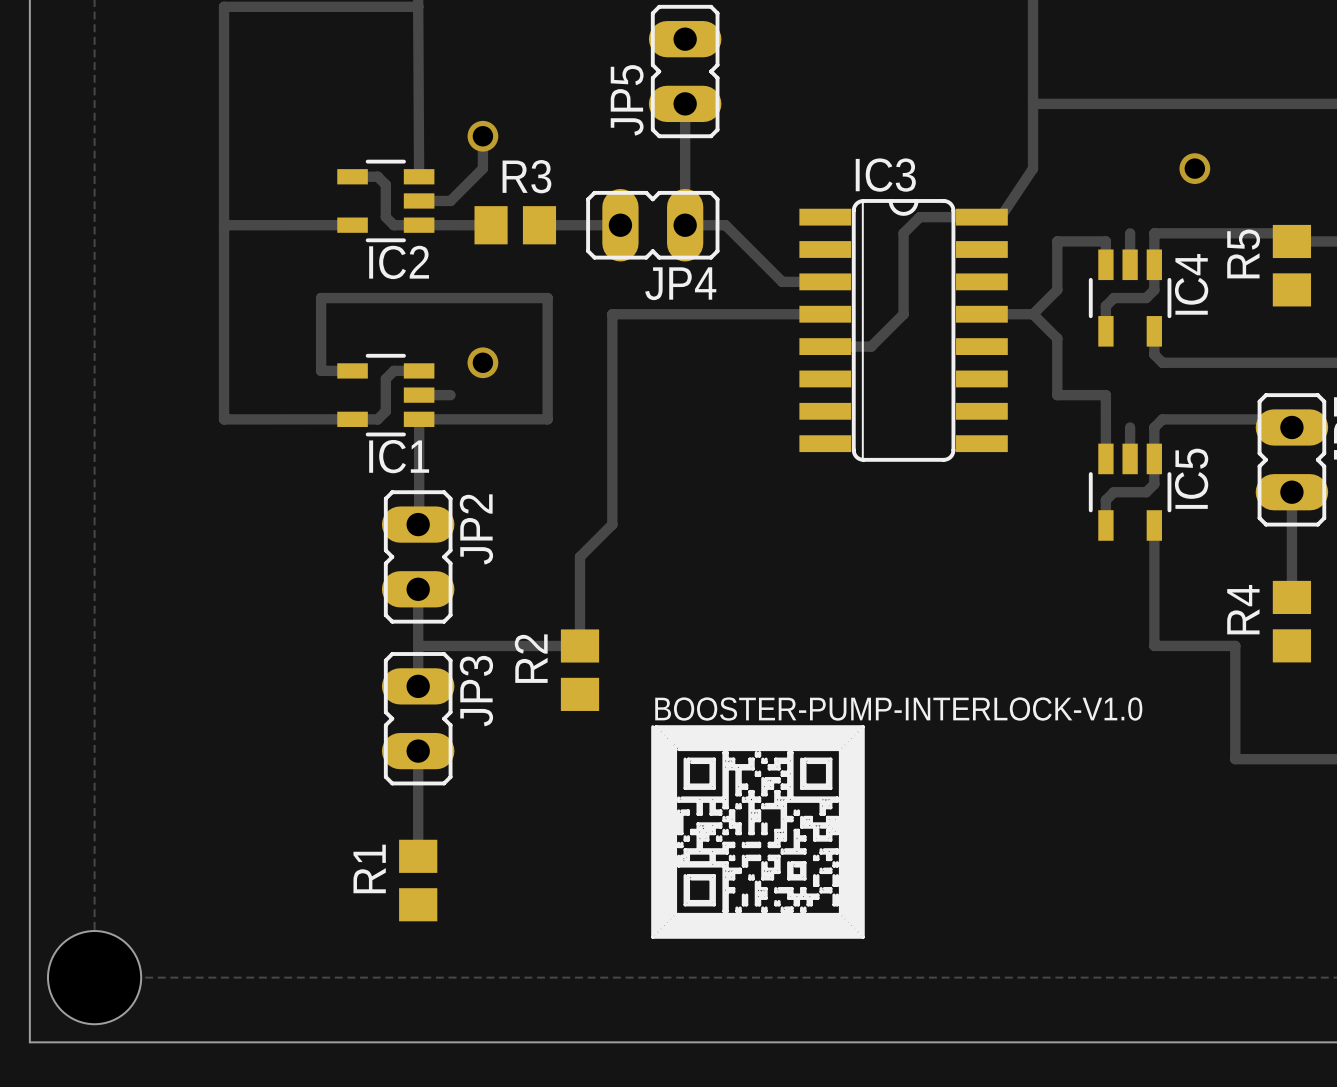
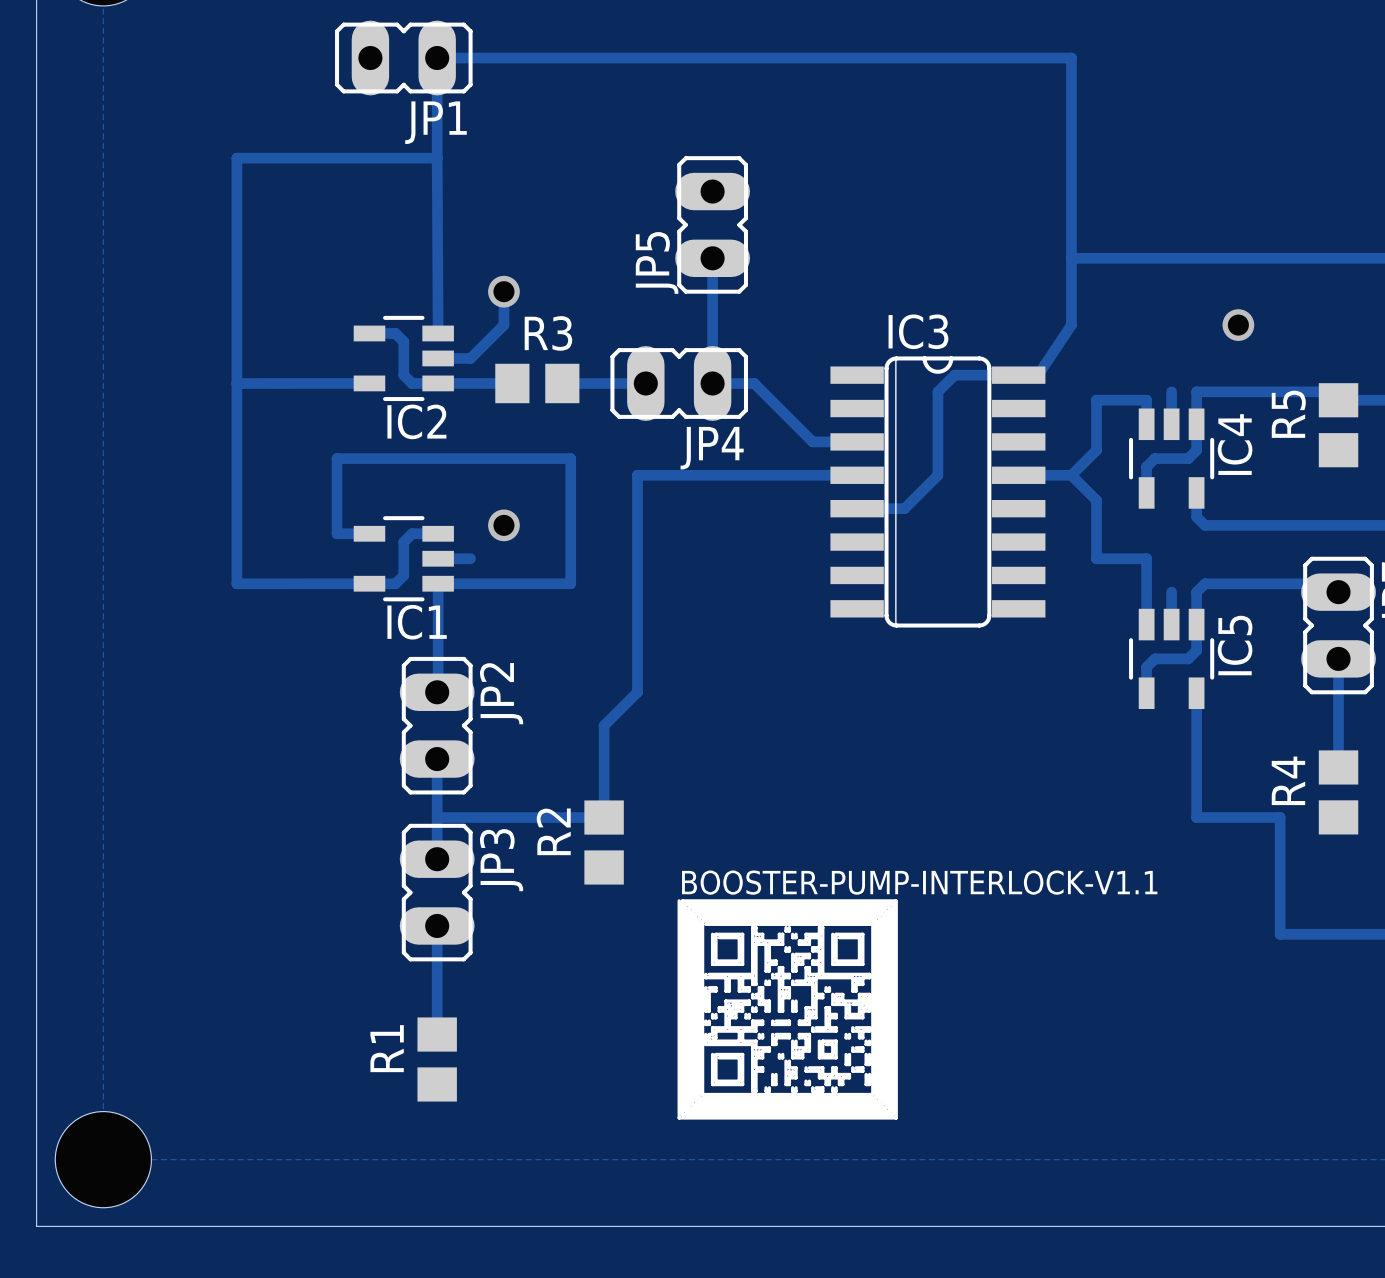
BOOSTER-PUMP-INTERLOCK-V1.0 name: BOOSTER-PUMP-INTERLOCK-V1.0 (898, 709) -> BOOSTER-PUMP-INTERLOCK-V1.1 (919, 882)

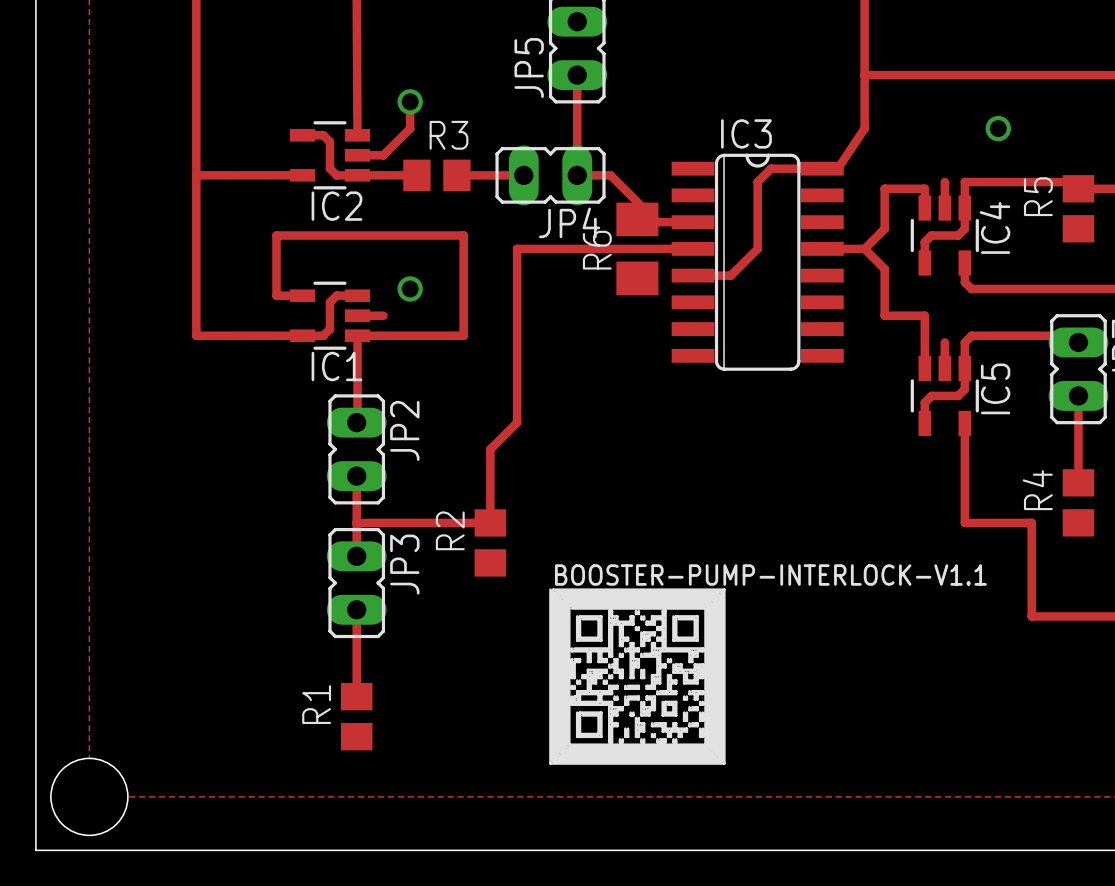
R6: none -> (637, 248)

